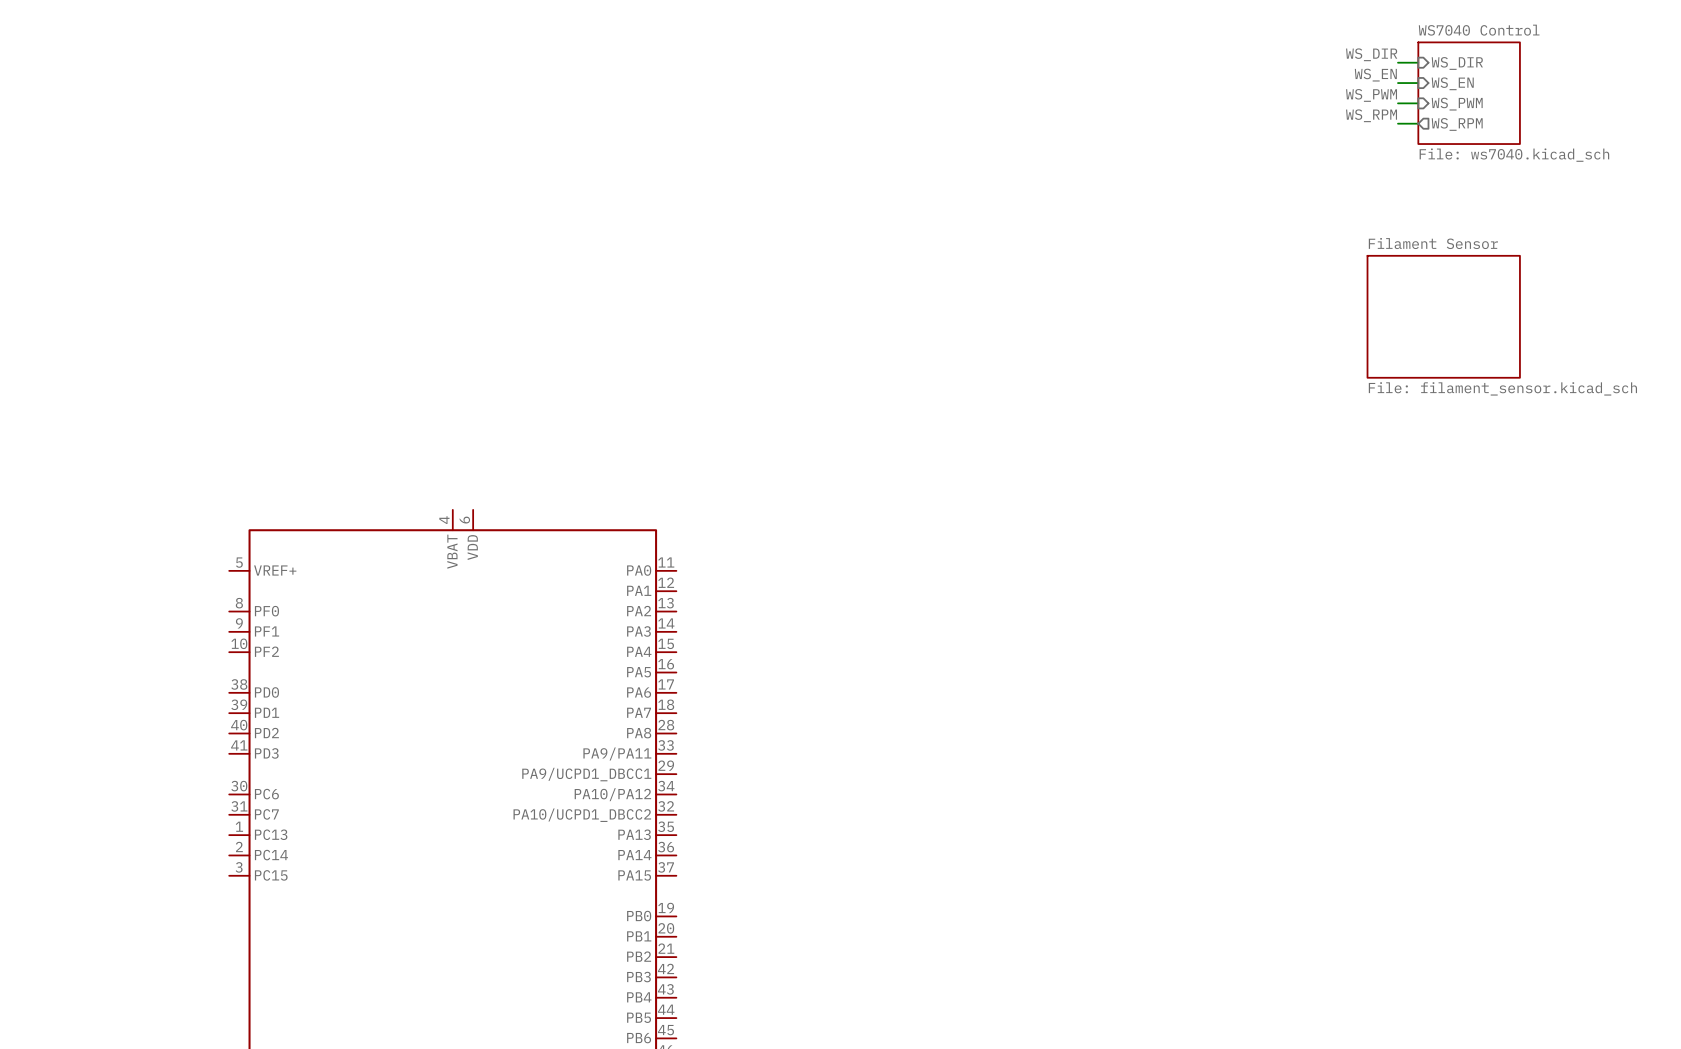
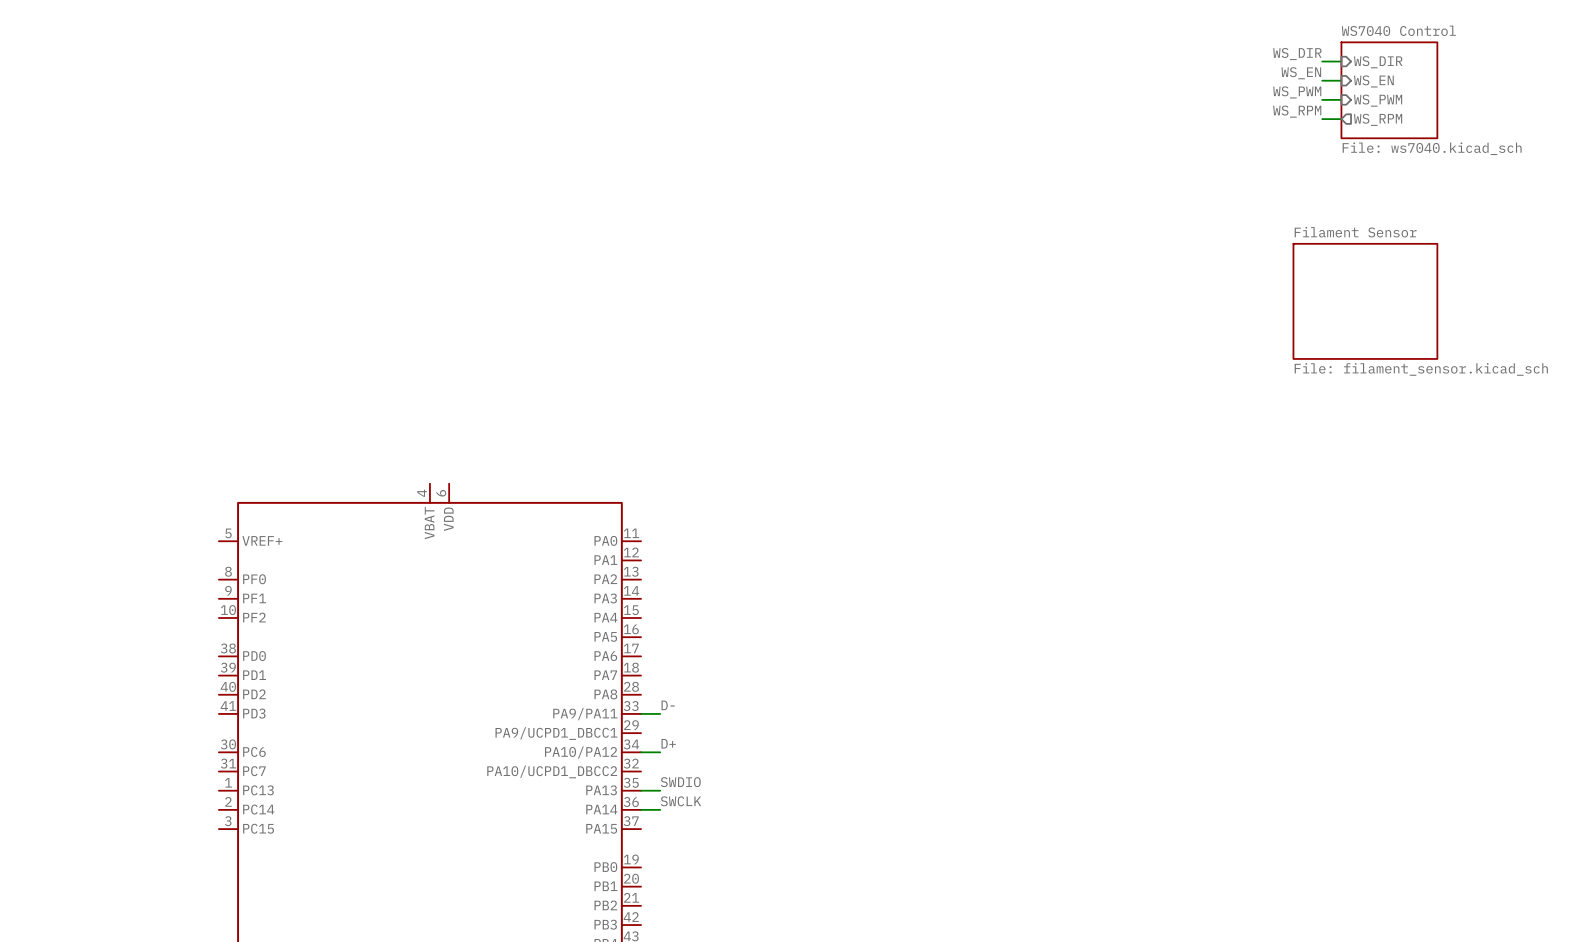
label: none -> D- (668, 705)
wire: none -> (641, 713) (660, 713)
label: none -> D+ (668, 743)
wire: none -> (641, 752) (660, 752)
label: none -> SWDIO (680, 782)
wire: none -> (641, 790) (660, 790)
label: none -> SWCLK (681, 801)
wire: none -> (641, 809) (660, 809)

